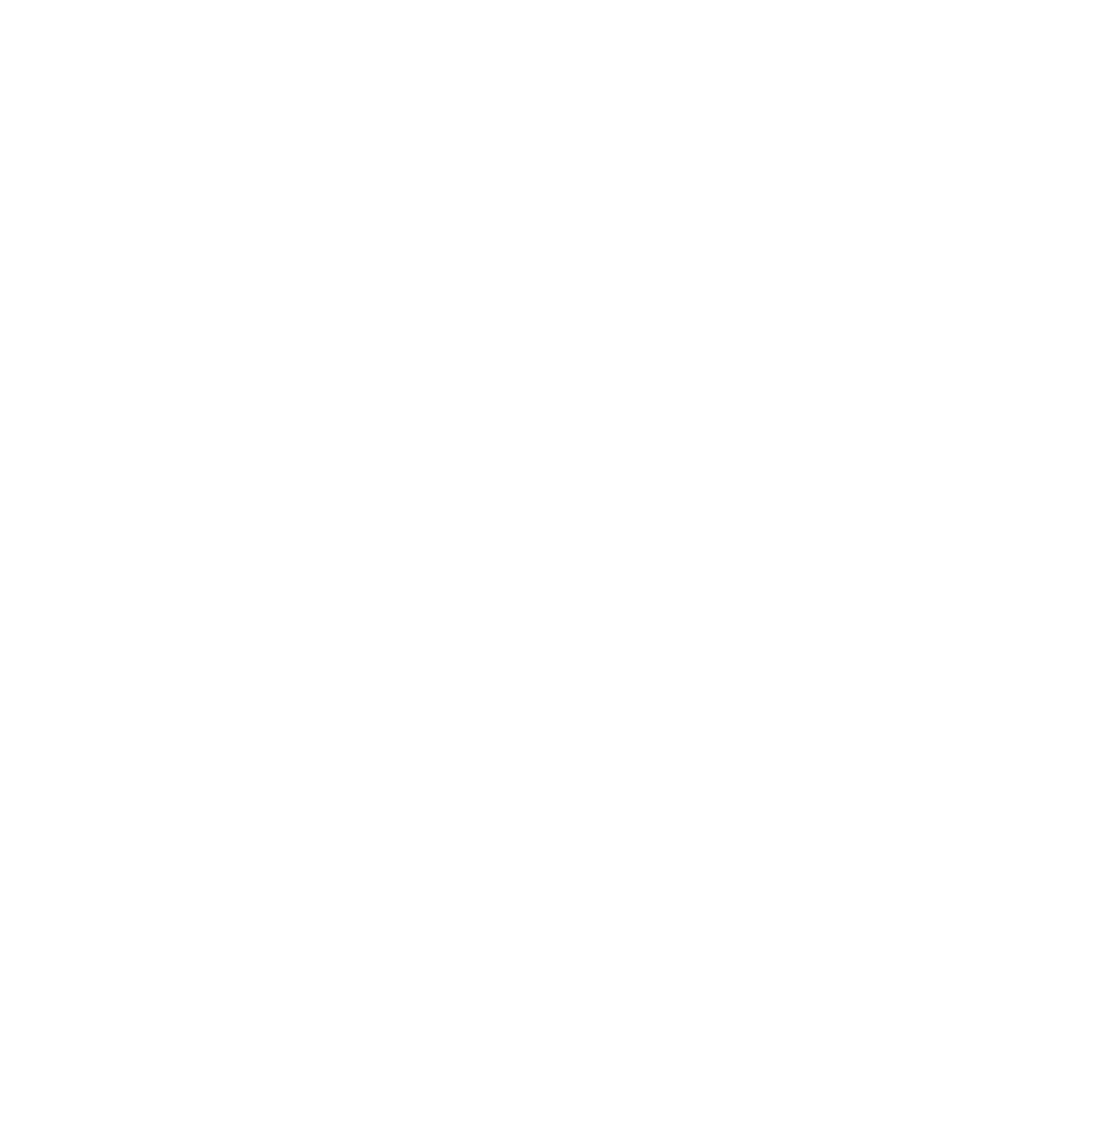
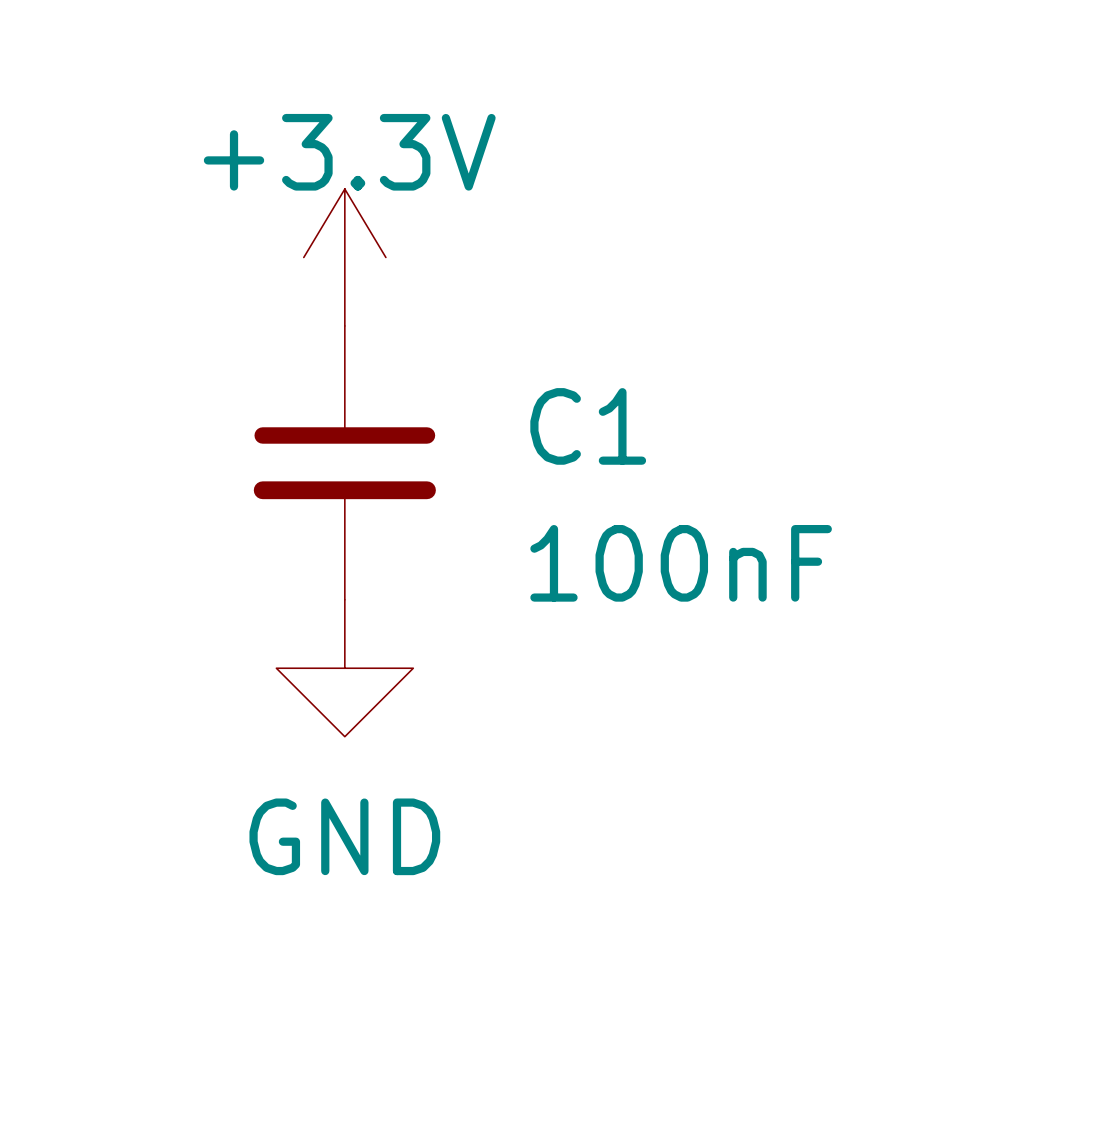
power symbol: none -> +3.3V (344, 257)
C1: none -> 100nF (344, 462)
power symbol: none -> GND (344, 668)

